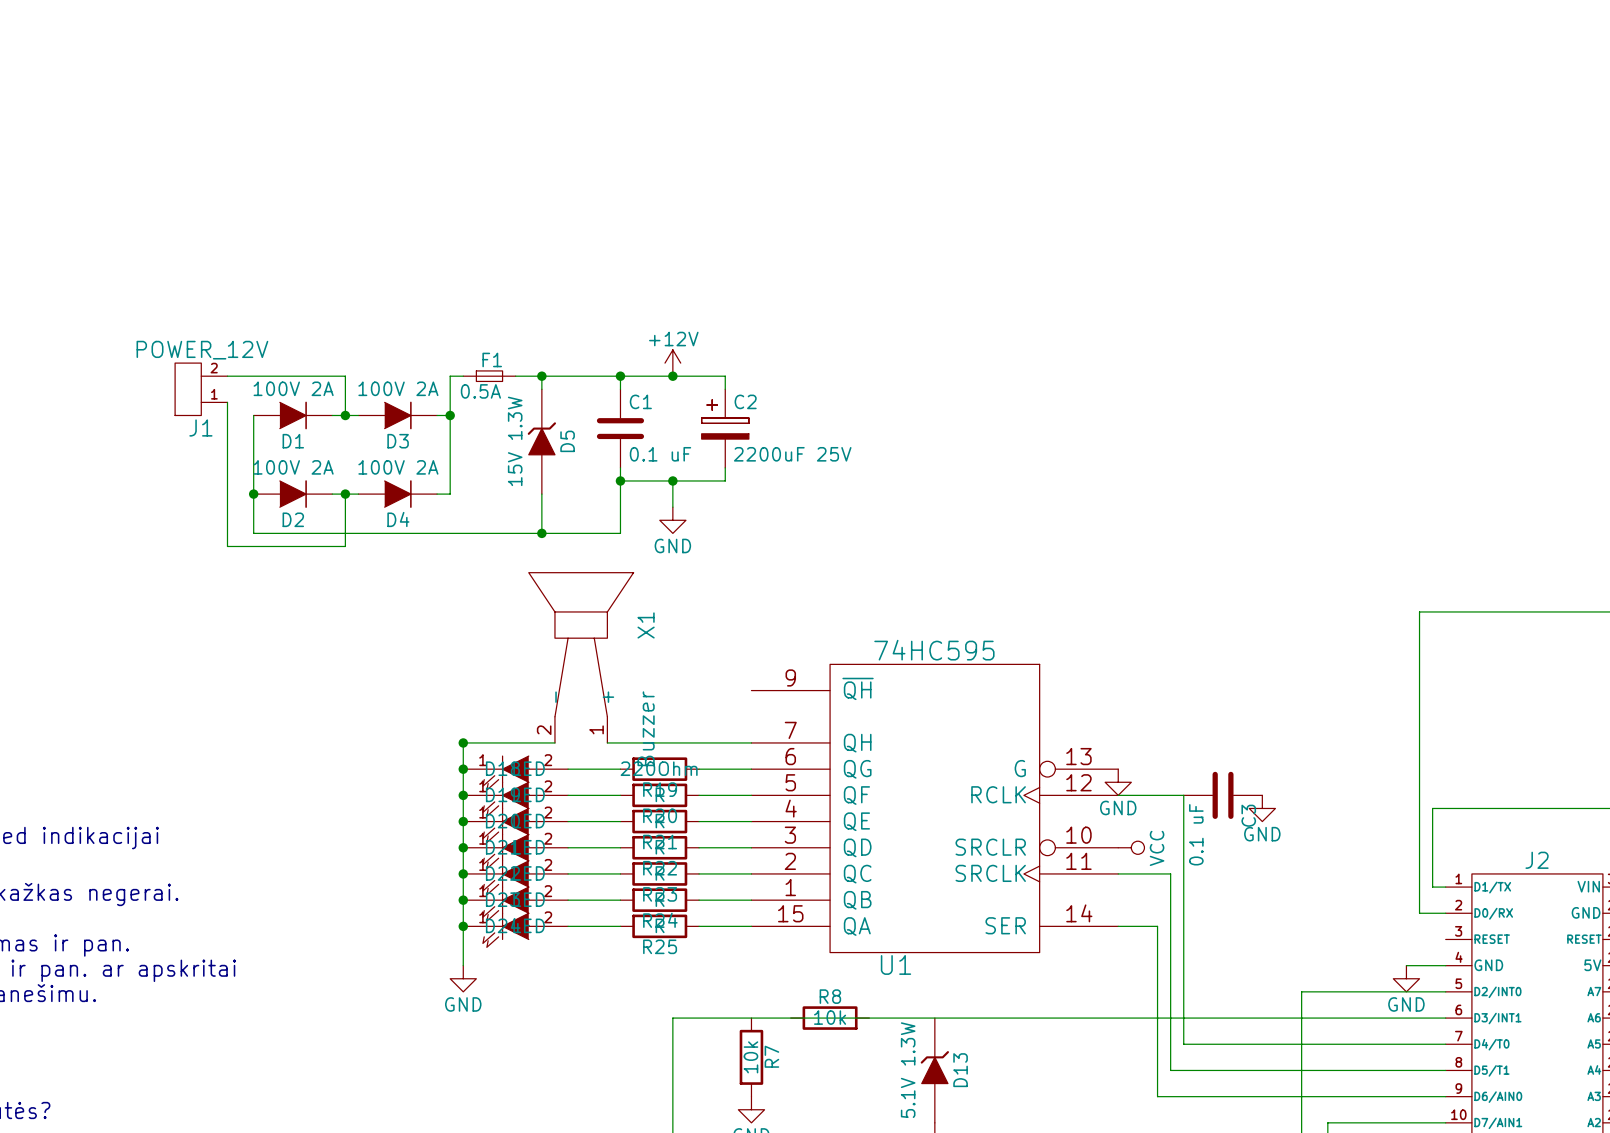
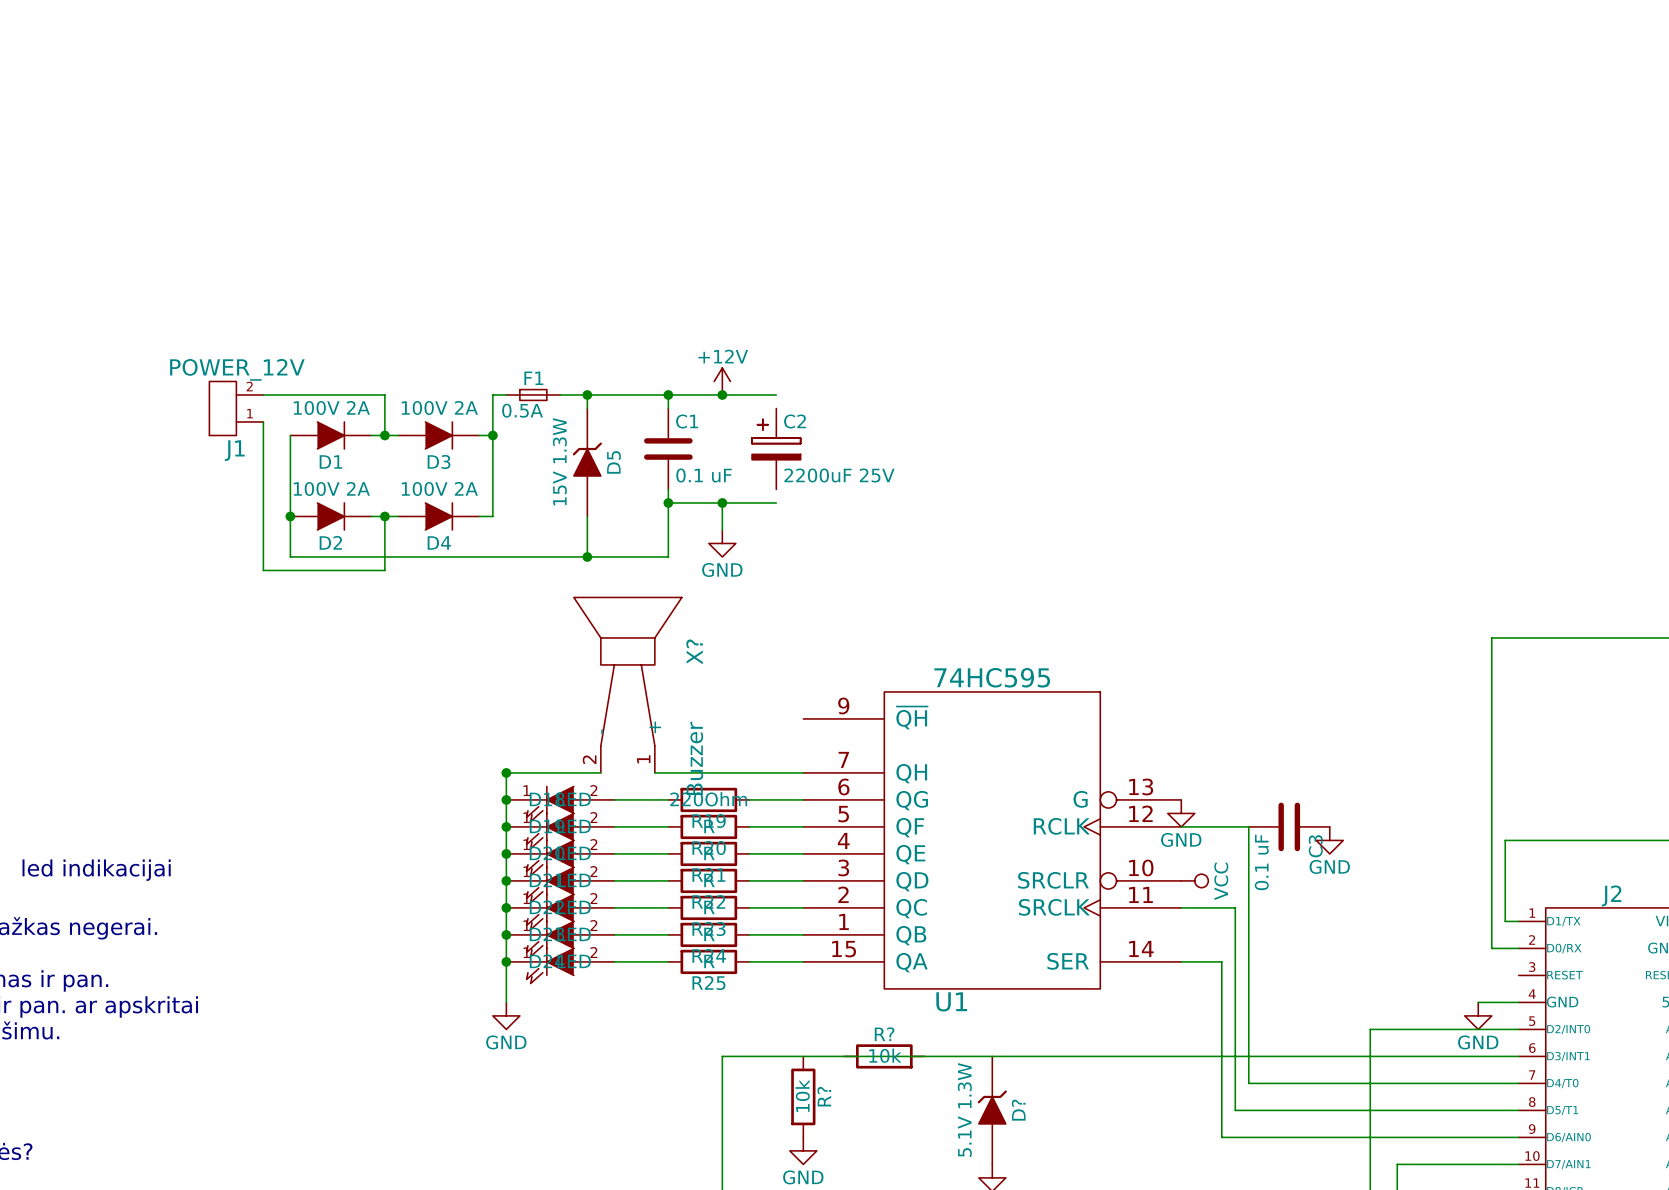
wire: (725, 376) (725, 389) -> none
wire: (725, 467) (725, 480) -> none
X1 name: X1 (646, 625) -> X? (694, 651)
R8 name: R8 (830, 996) -> R? (884, 1034)
R7 name: R7 (771, 1056) -> R? (824, 1096)
D13 name: D13 (960, 1070) -> D? (1018, 1110)

